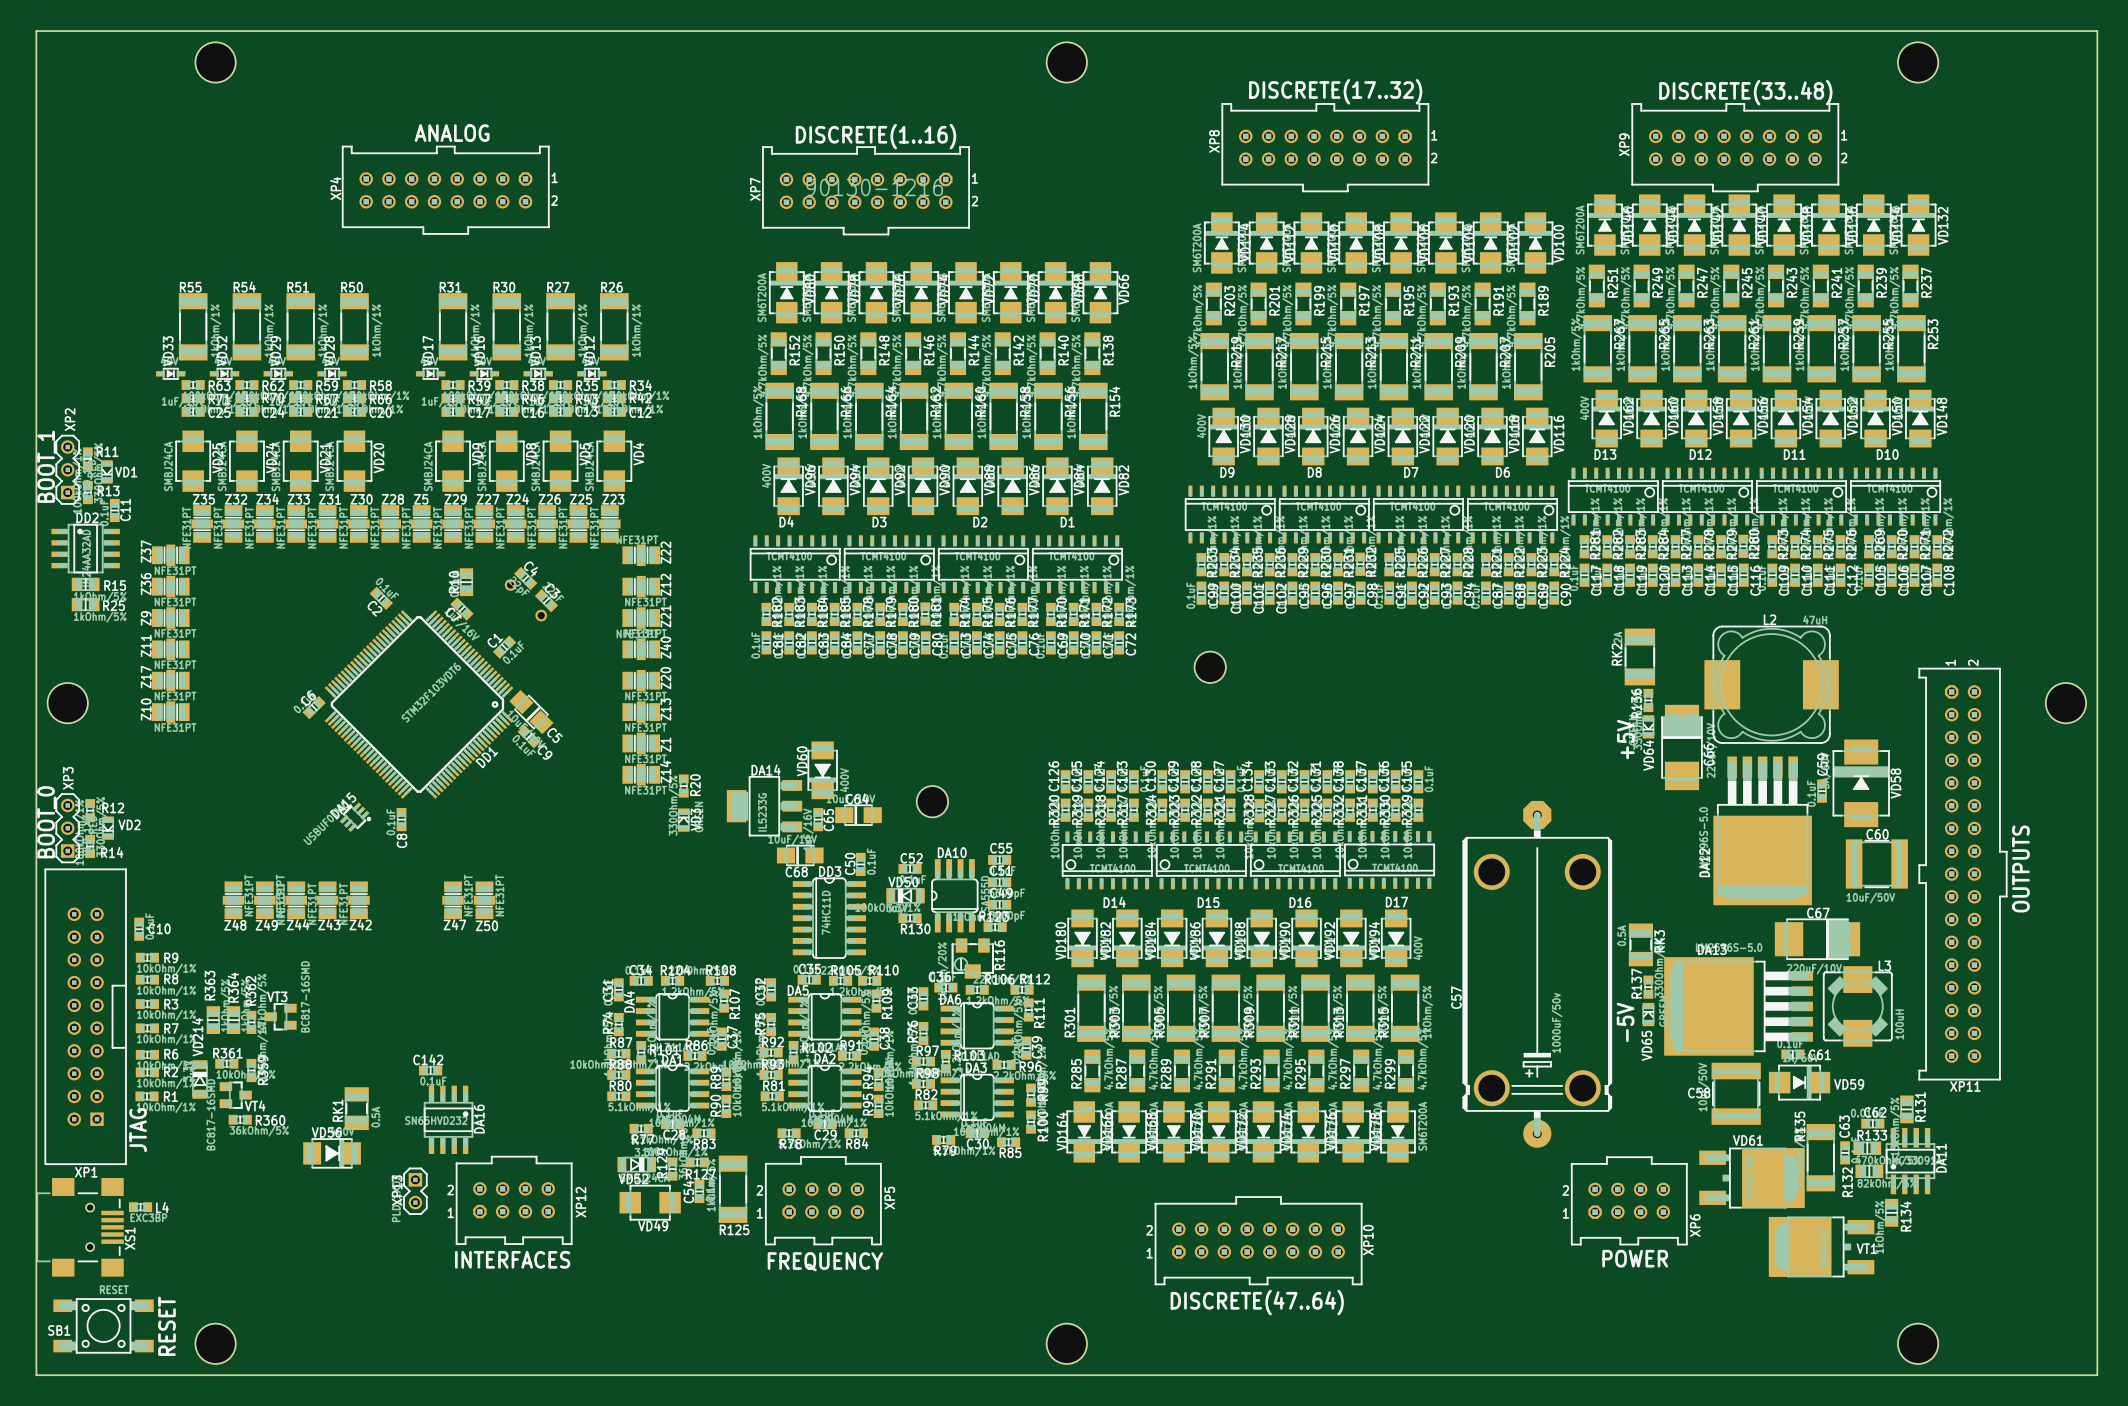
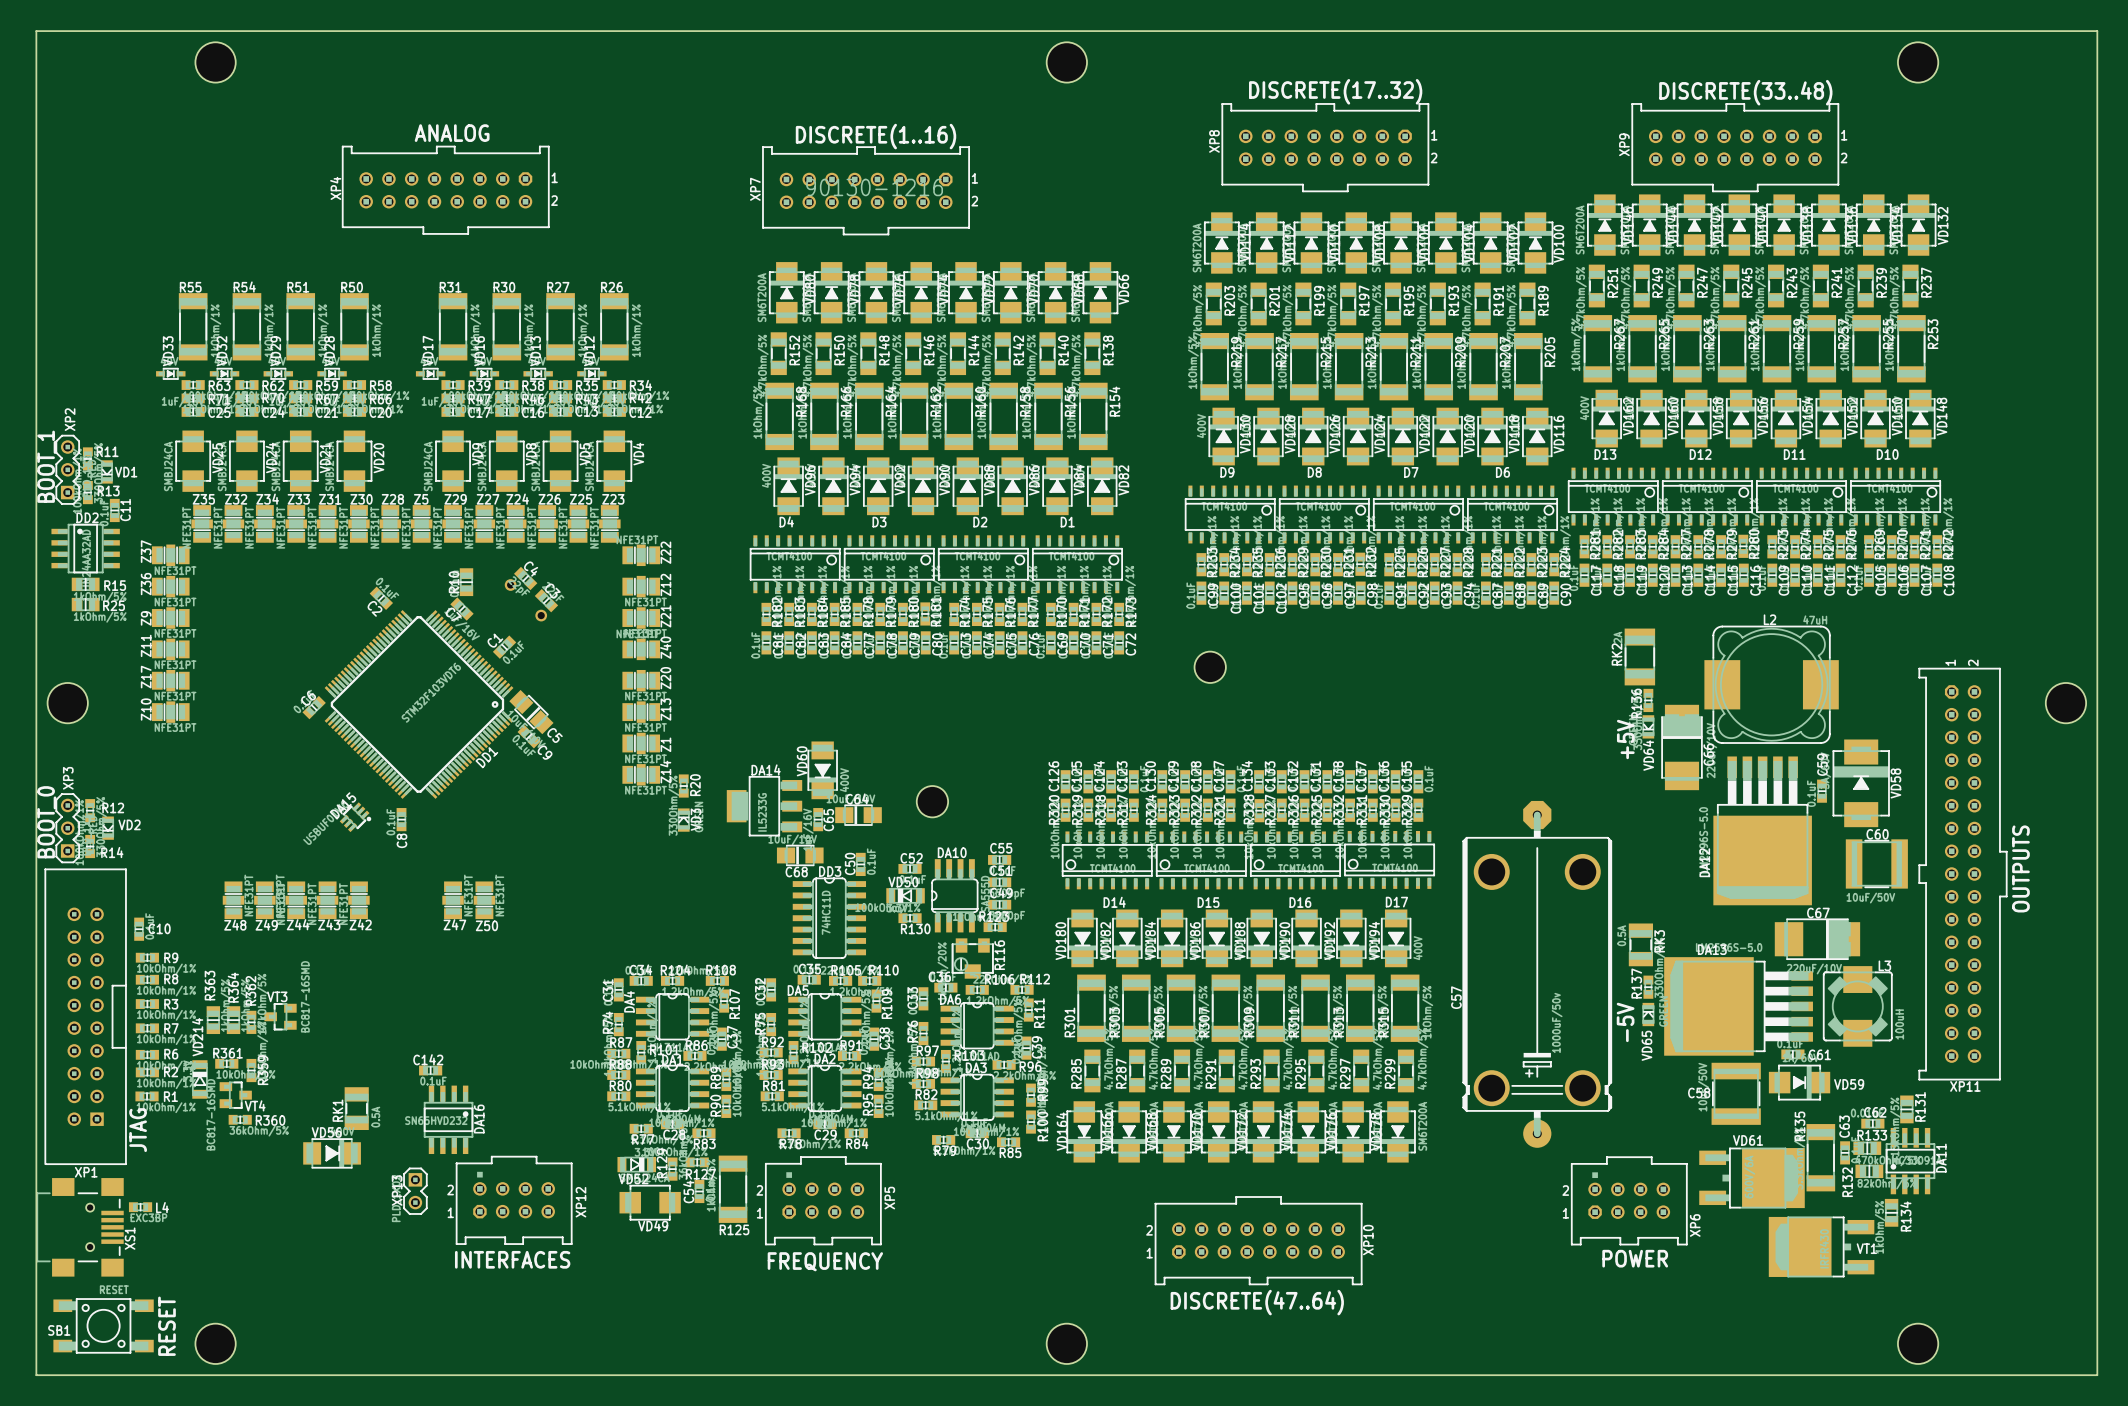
XP12 footprint: [455, 1155, 573, 1245] -> [455, 1155, 573, 1245]
XP5 footprint: [764, 1156, 882, 1246] -> [764, 1156, 882, 1246]
XP6 footprint: [1570, 1156, 1688, 1246] -> [1570, 1156, 1688, 1246]

